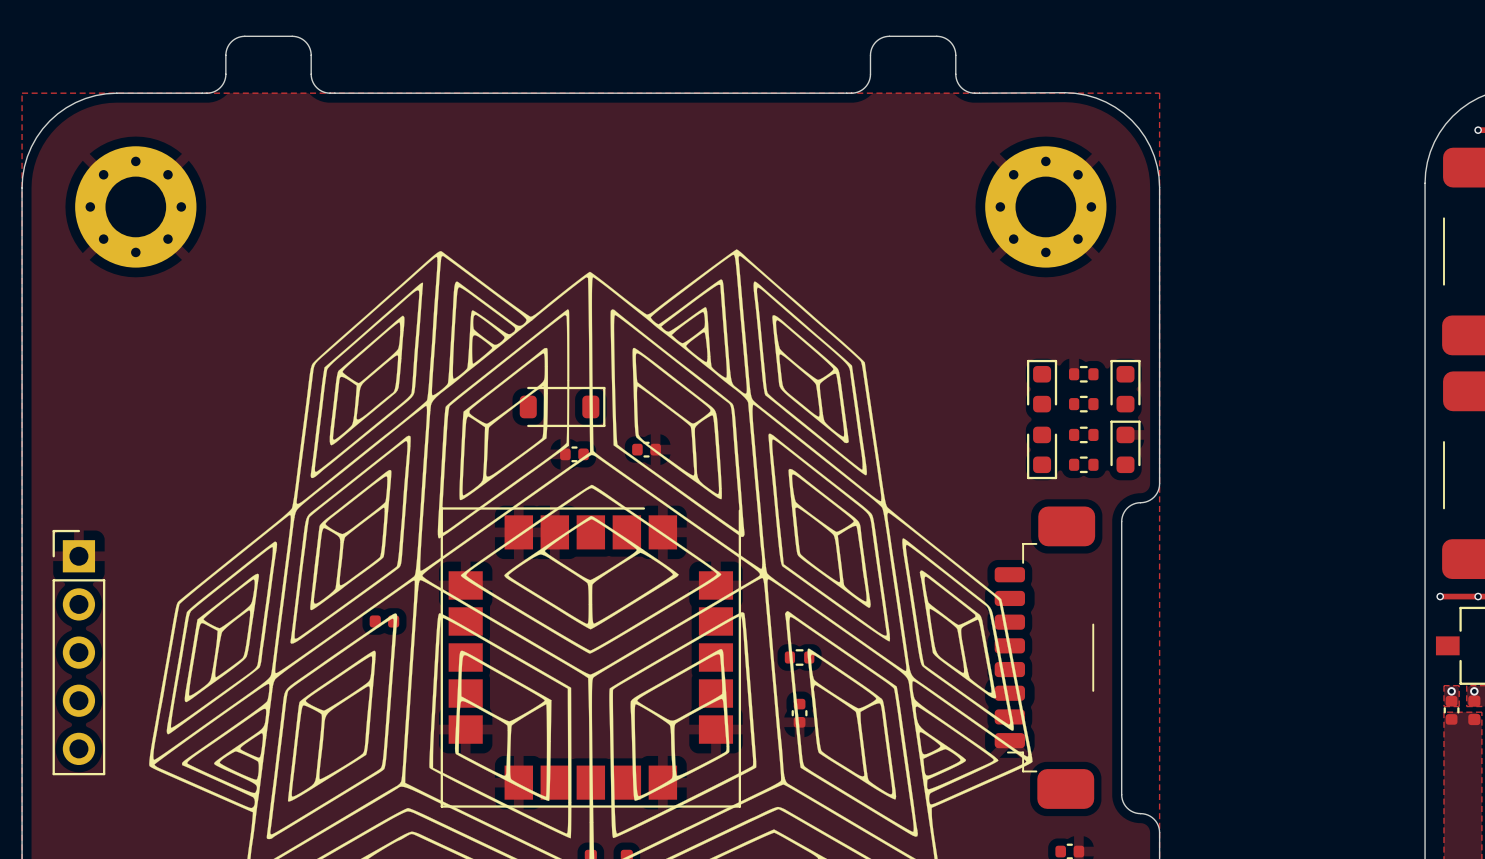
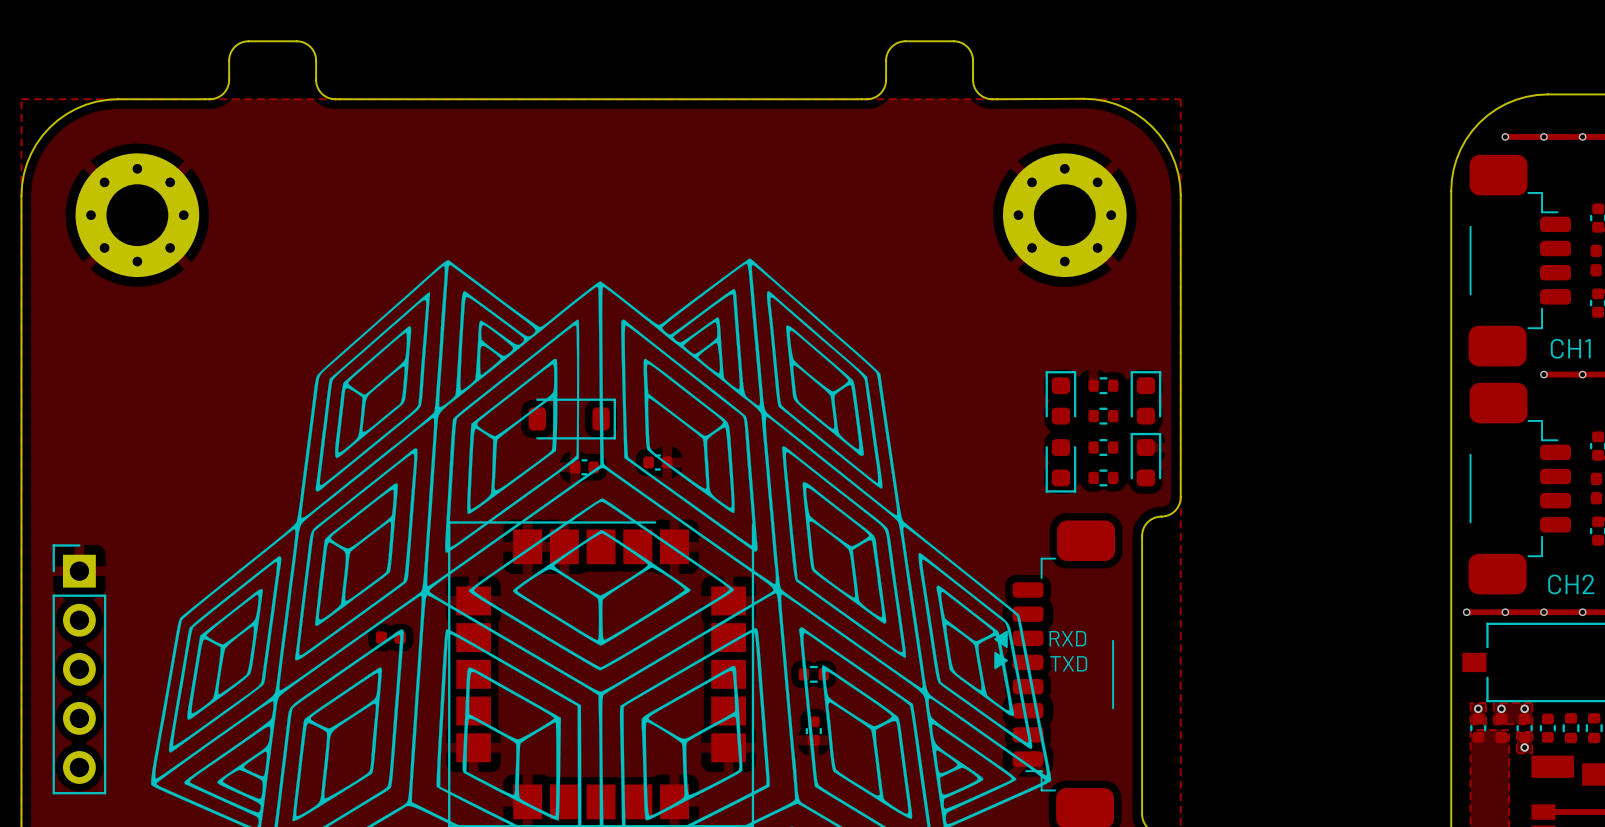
drawing: none -> [994, 630, 1008, 670]
text: none -> RXD (1067, 638)
text: none -> TXD (1068, 663)

